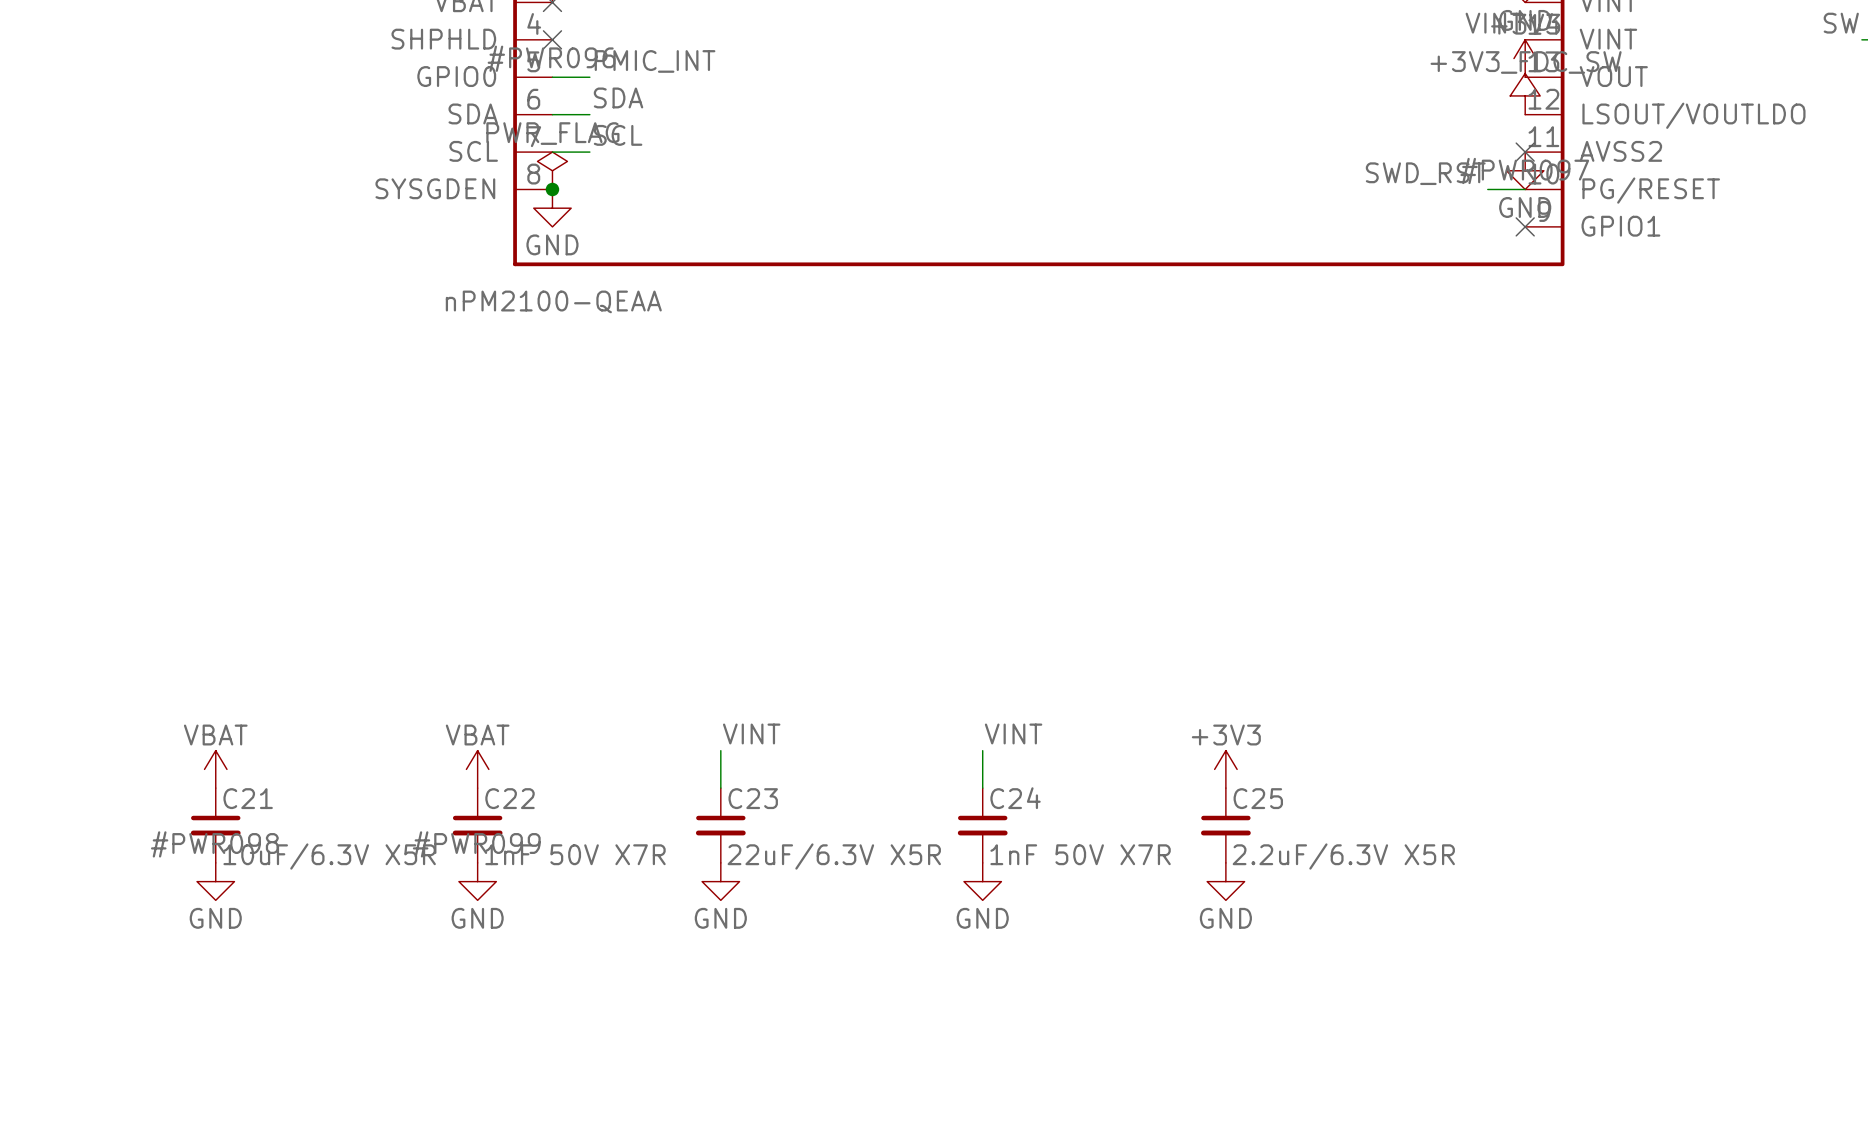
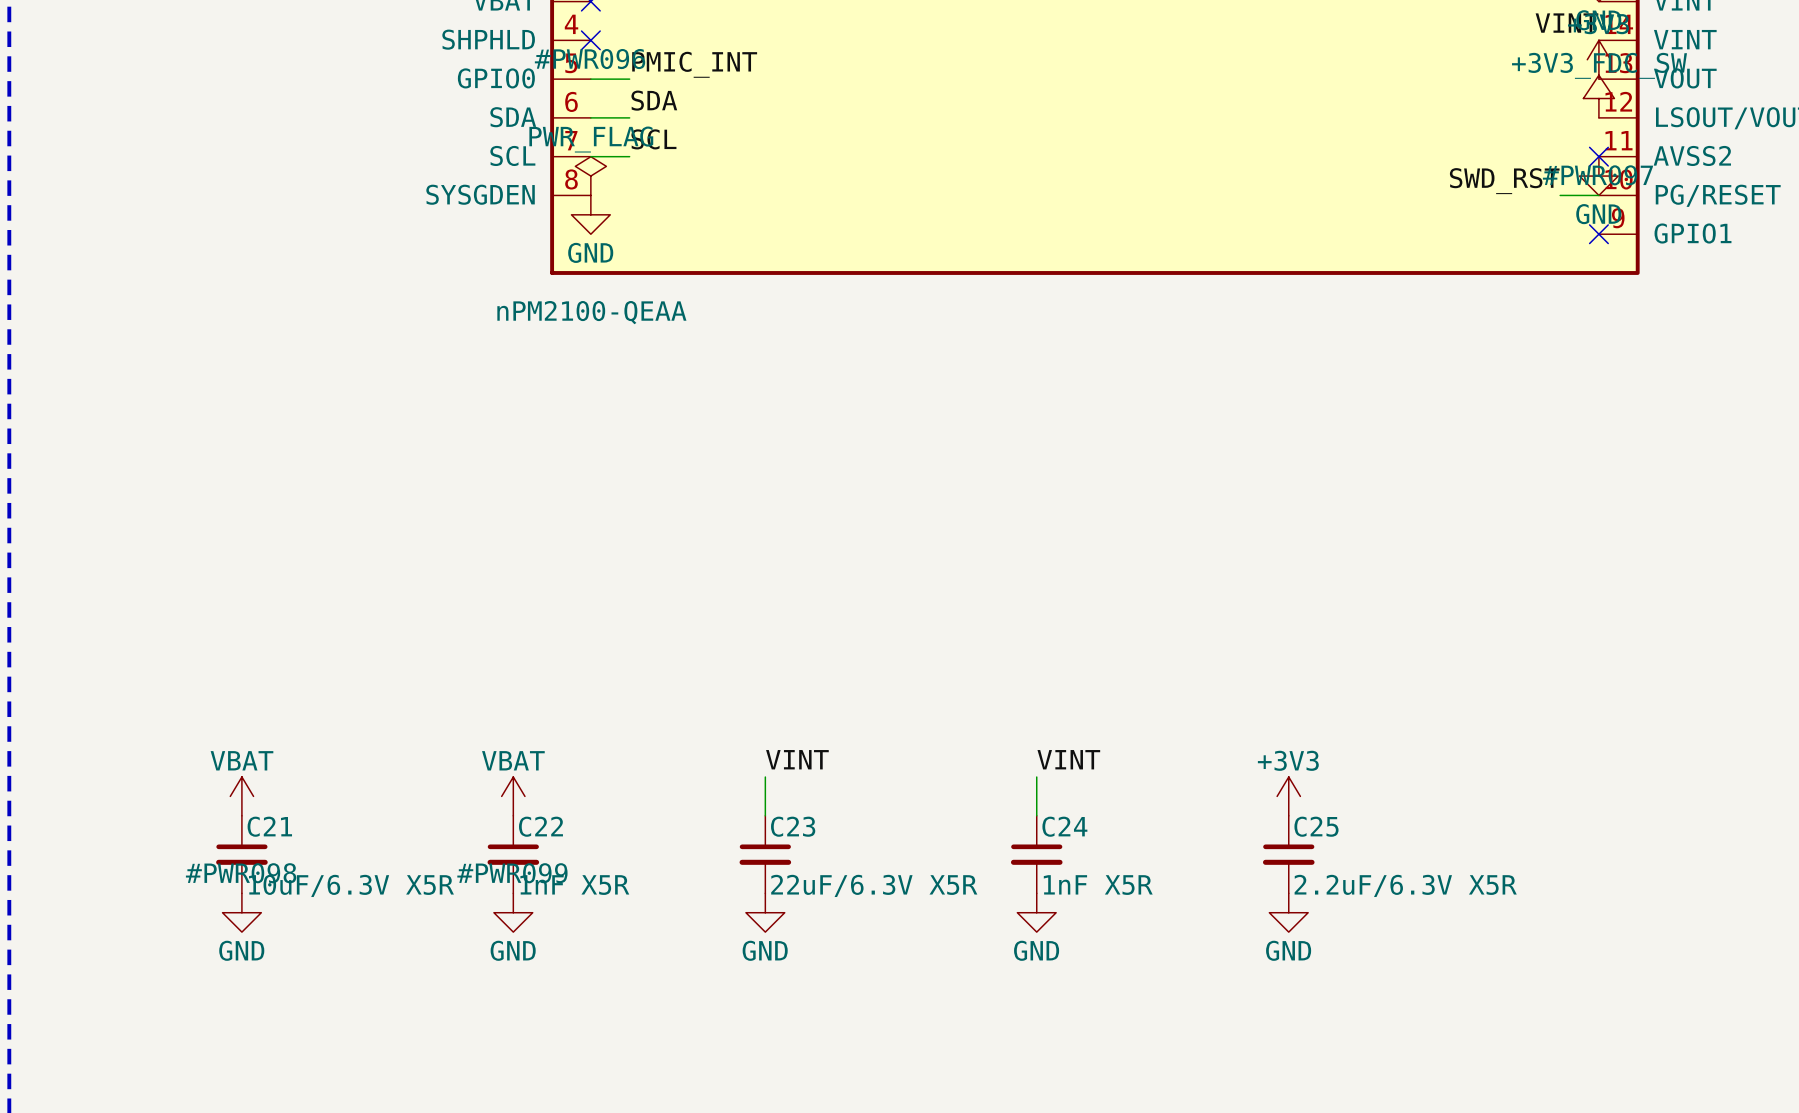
junction: (552, 189) -> none
C22 value: 1nF 50V X7R (575, 854) -> 1nF X5R (574, 885)
C24 value: 1nF 50V X7R (1080, 854) -> 1nF X5R (1098, 885)

